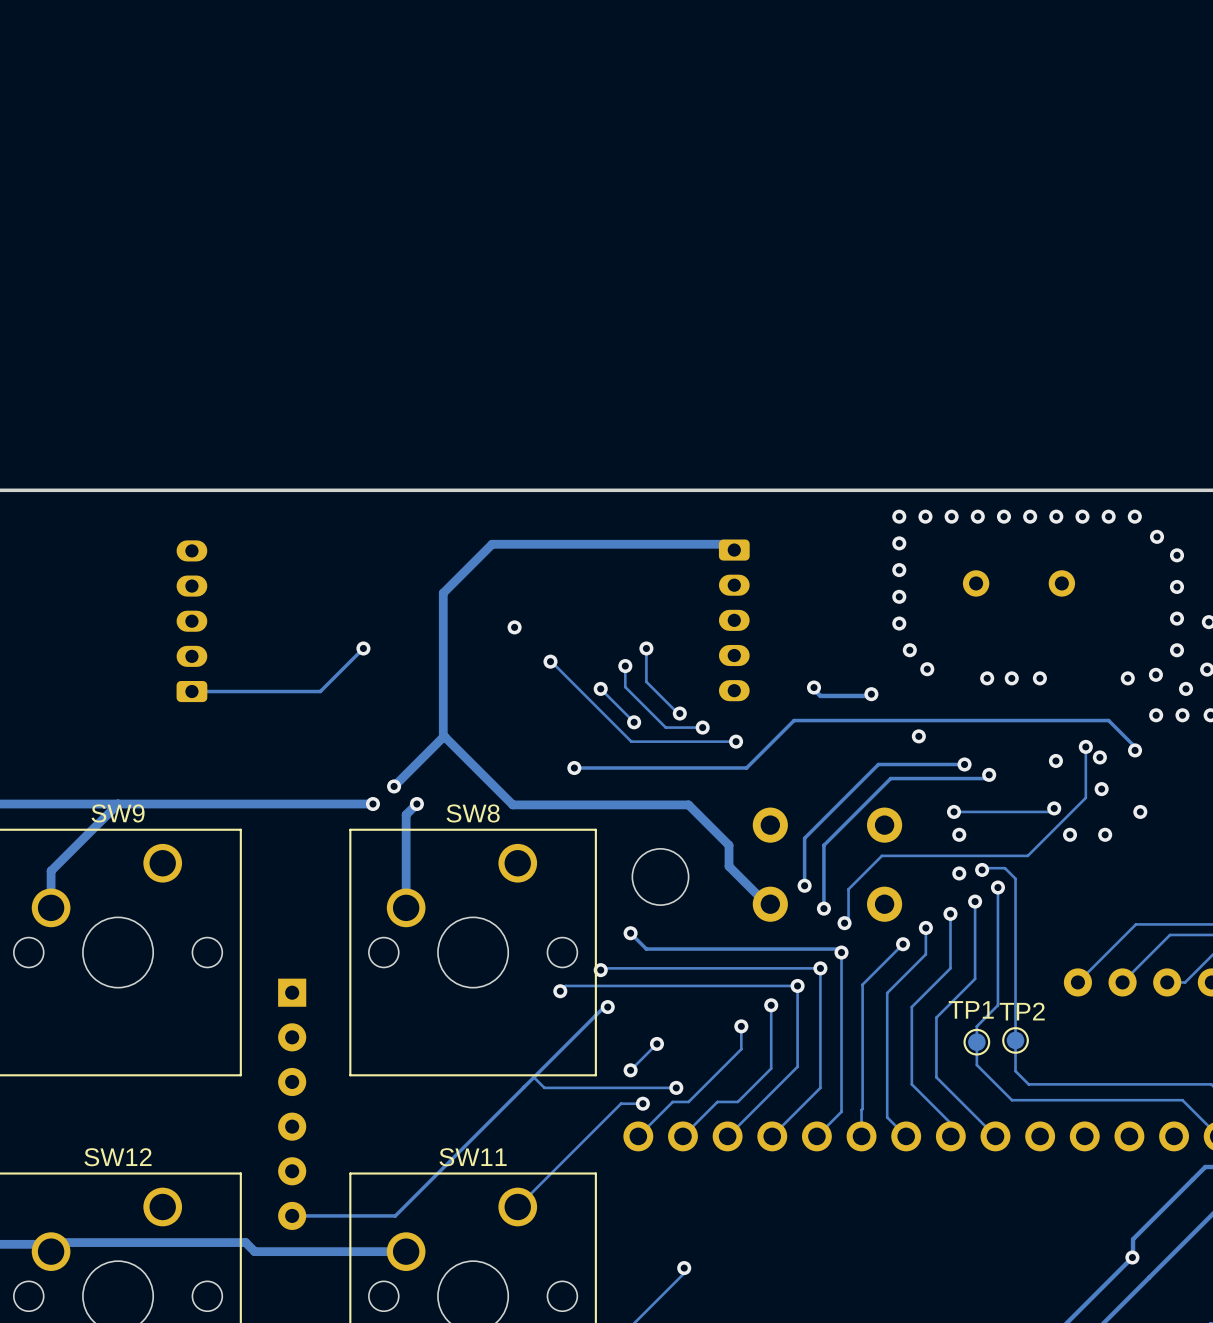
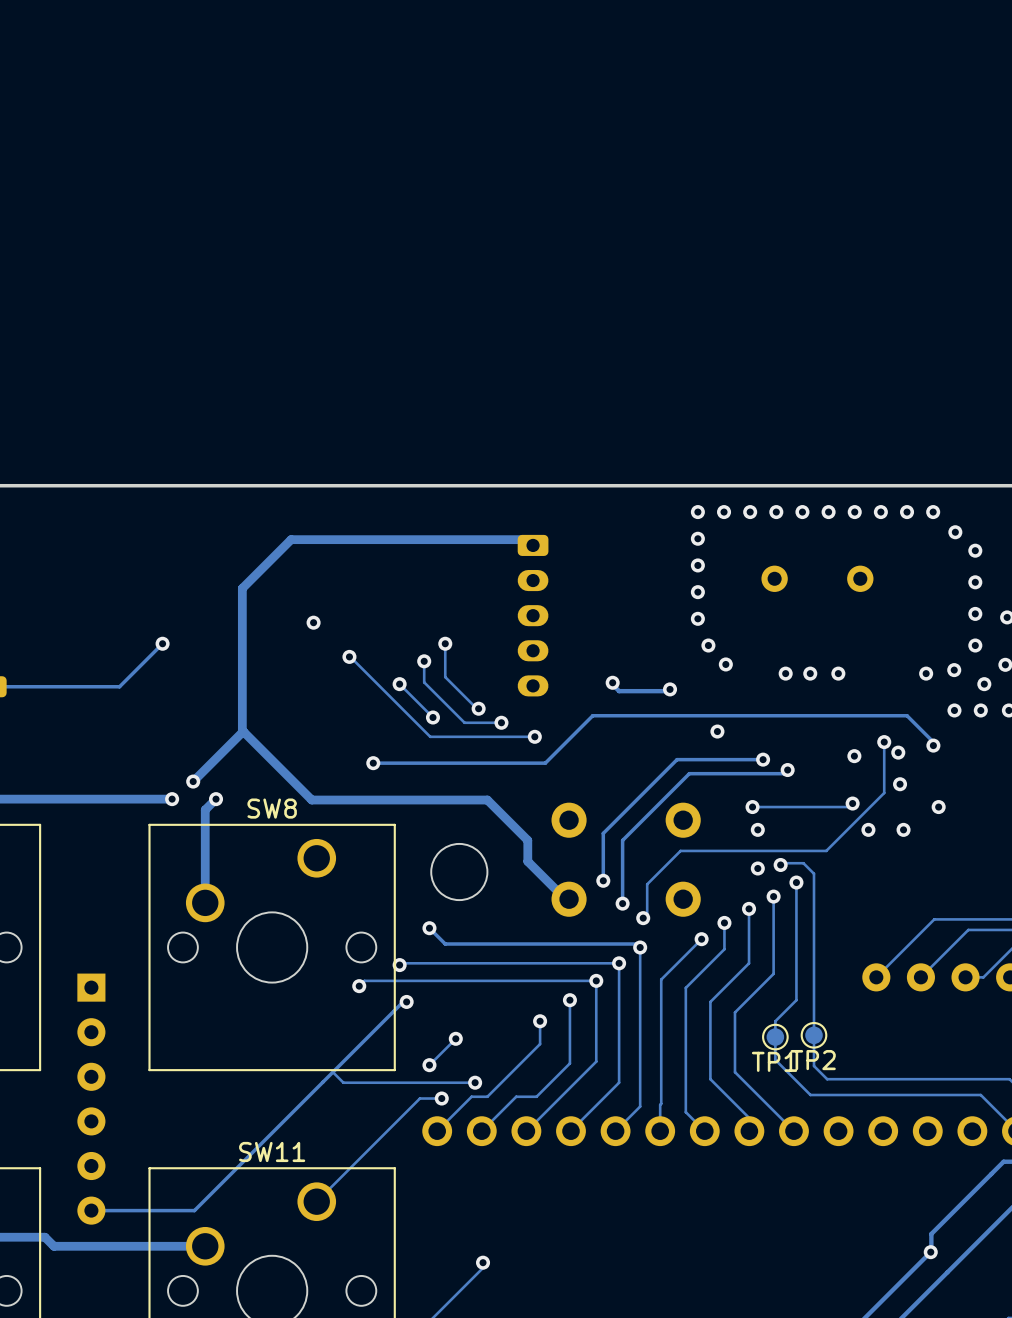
TP1 name position: TP1 (971, 1009) -> TP1 (774, 1061)
TP2 name position: TP2 (1022, 1011) -> TP2 (813, 1060)

